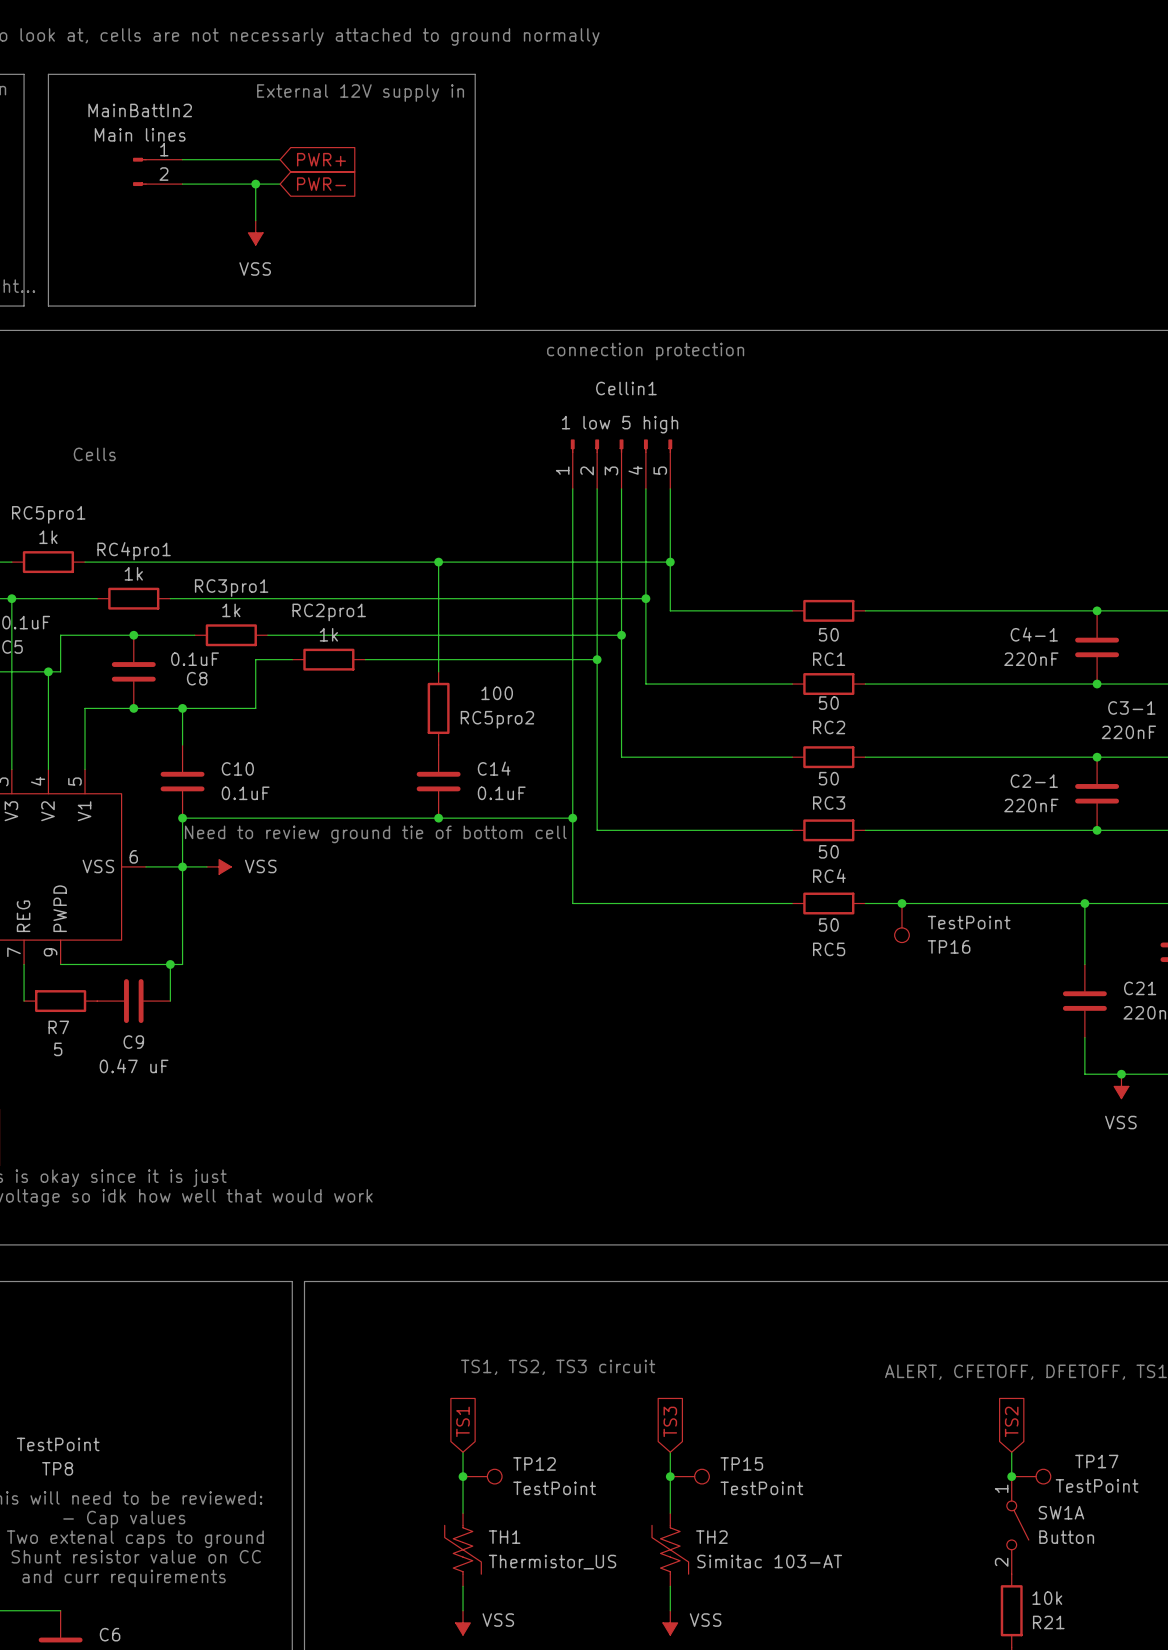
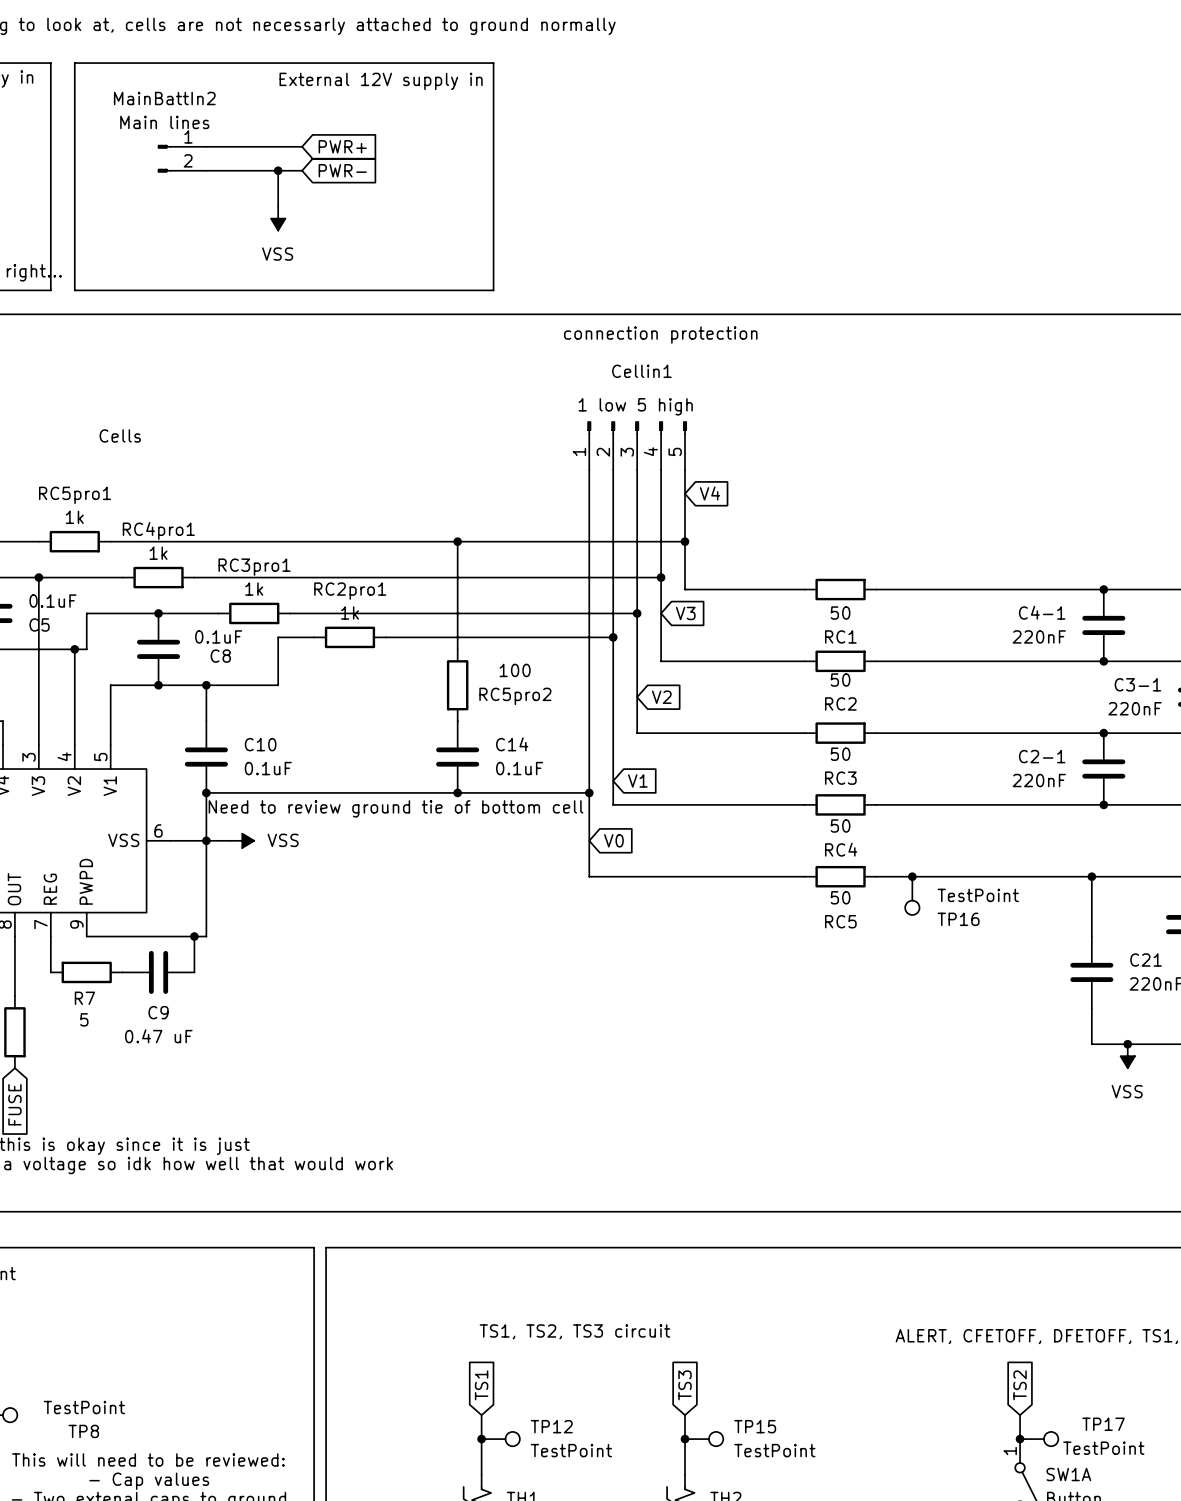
global label: none -> V4 (709, 493)
global label: none -> V3 (685, 613)
global label: none -> V2 (661, 697)
global label: none -> V1 (637, 780)
global label: none -> V0 (613, 840)

